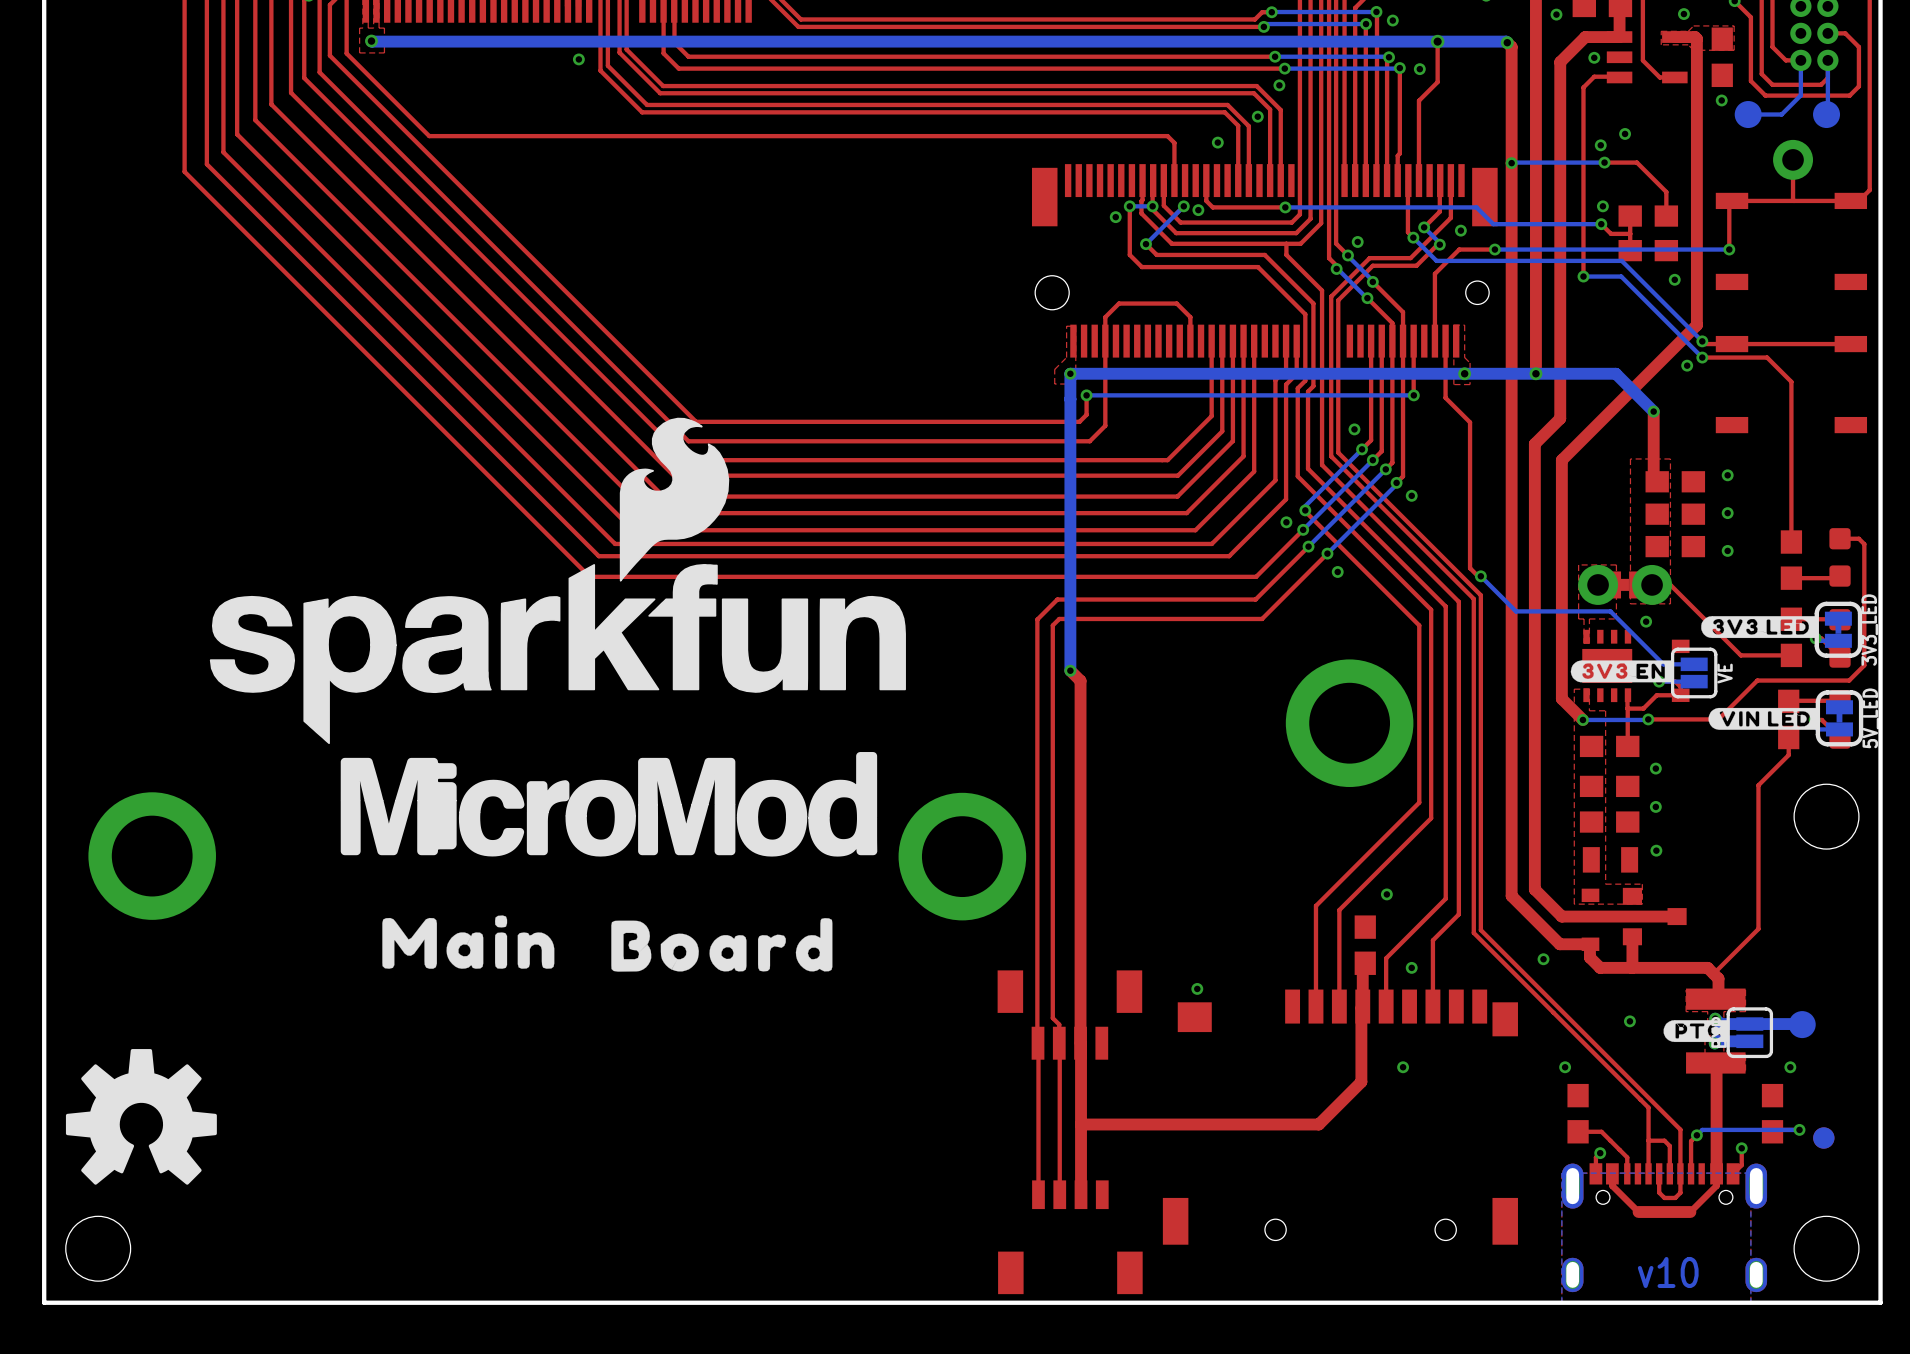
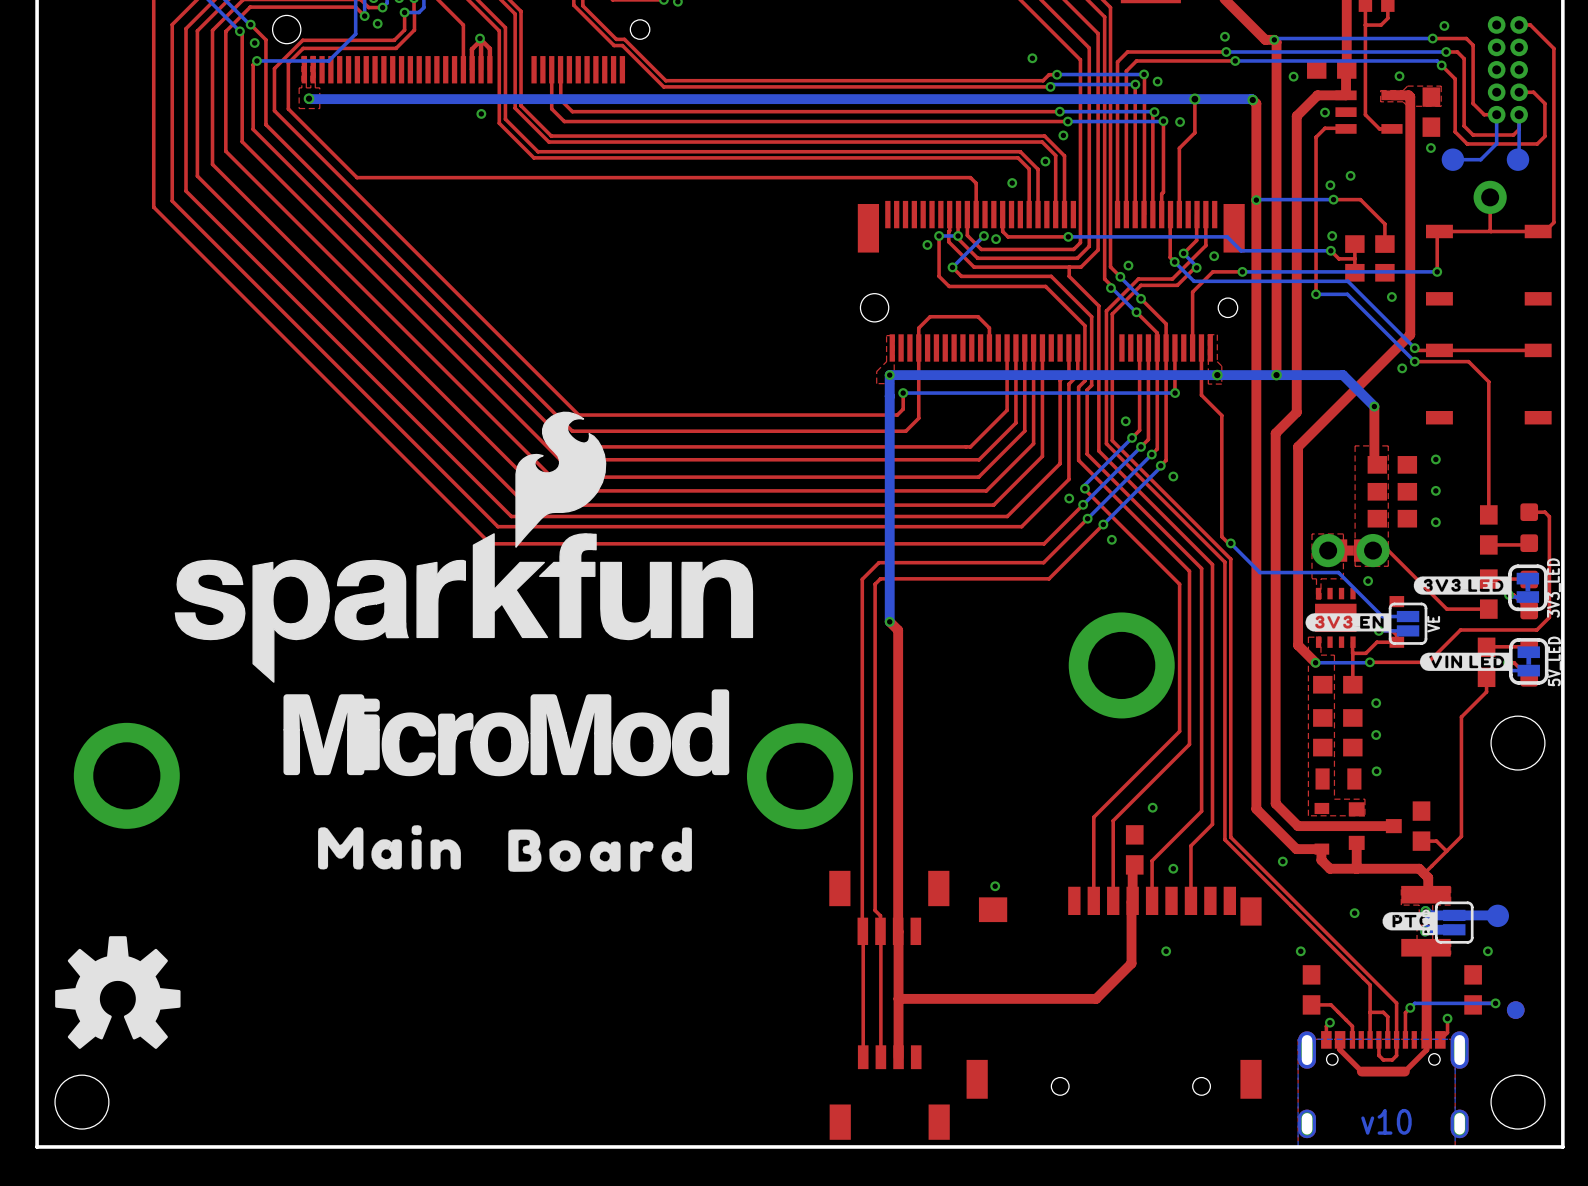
part: none -> (1421, 826)
top track: none -> (1423, 843) (1421, 841) (1436, 841) (1446, 851)

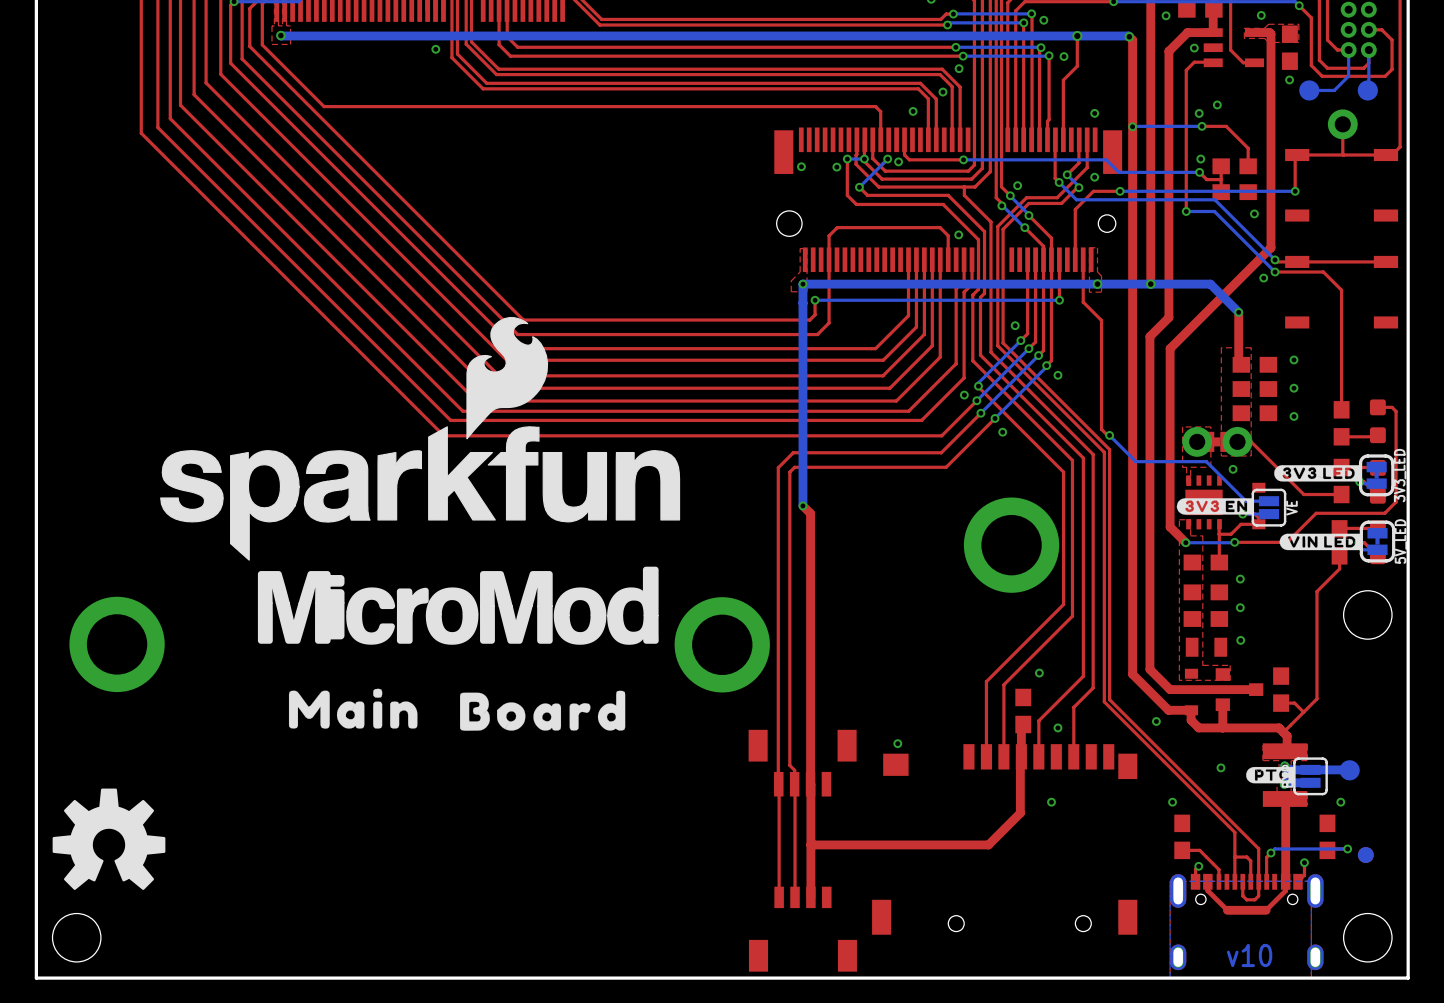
via: none -> (1094, 113)
via: none -> (801, 166)
via: none -> (958, 234)
top track: (918, 328) (930, 316) (978, 316) (989, 328) (989, 347) -> (829, 241) (829, 235) (837, 227) (940, 227) (948, 235) (948, 259)

